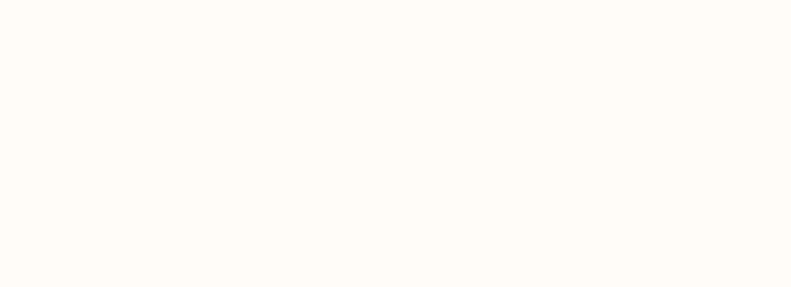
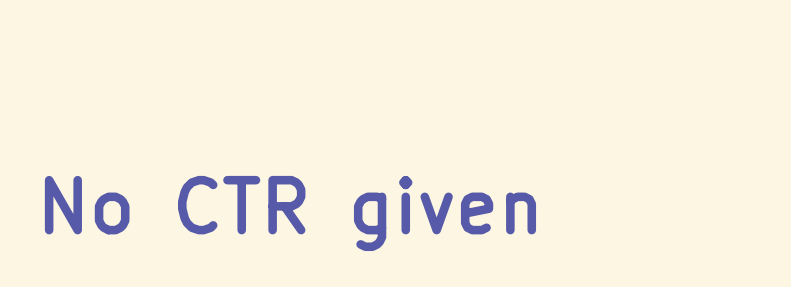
text: none -> No CTR given (290, 213)

